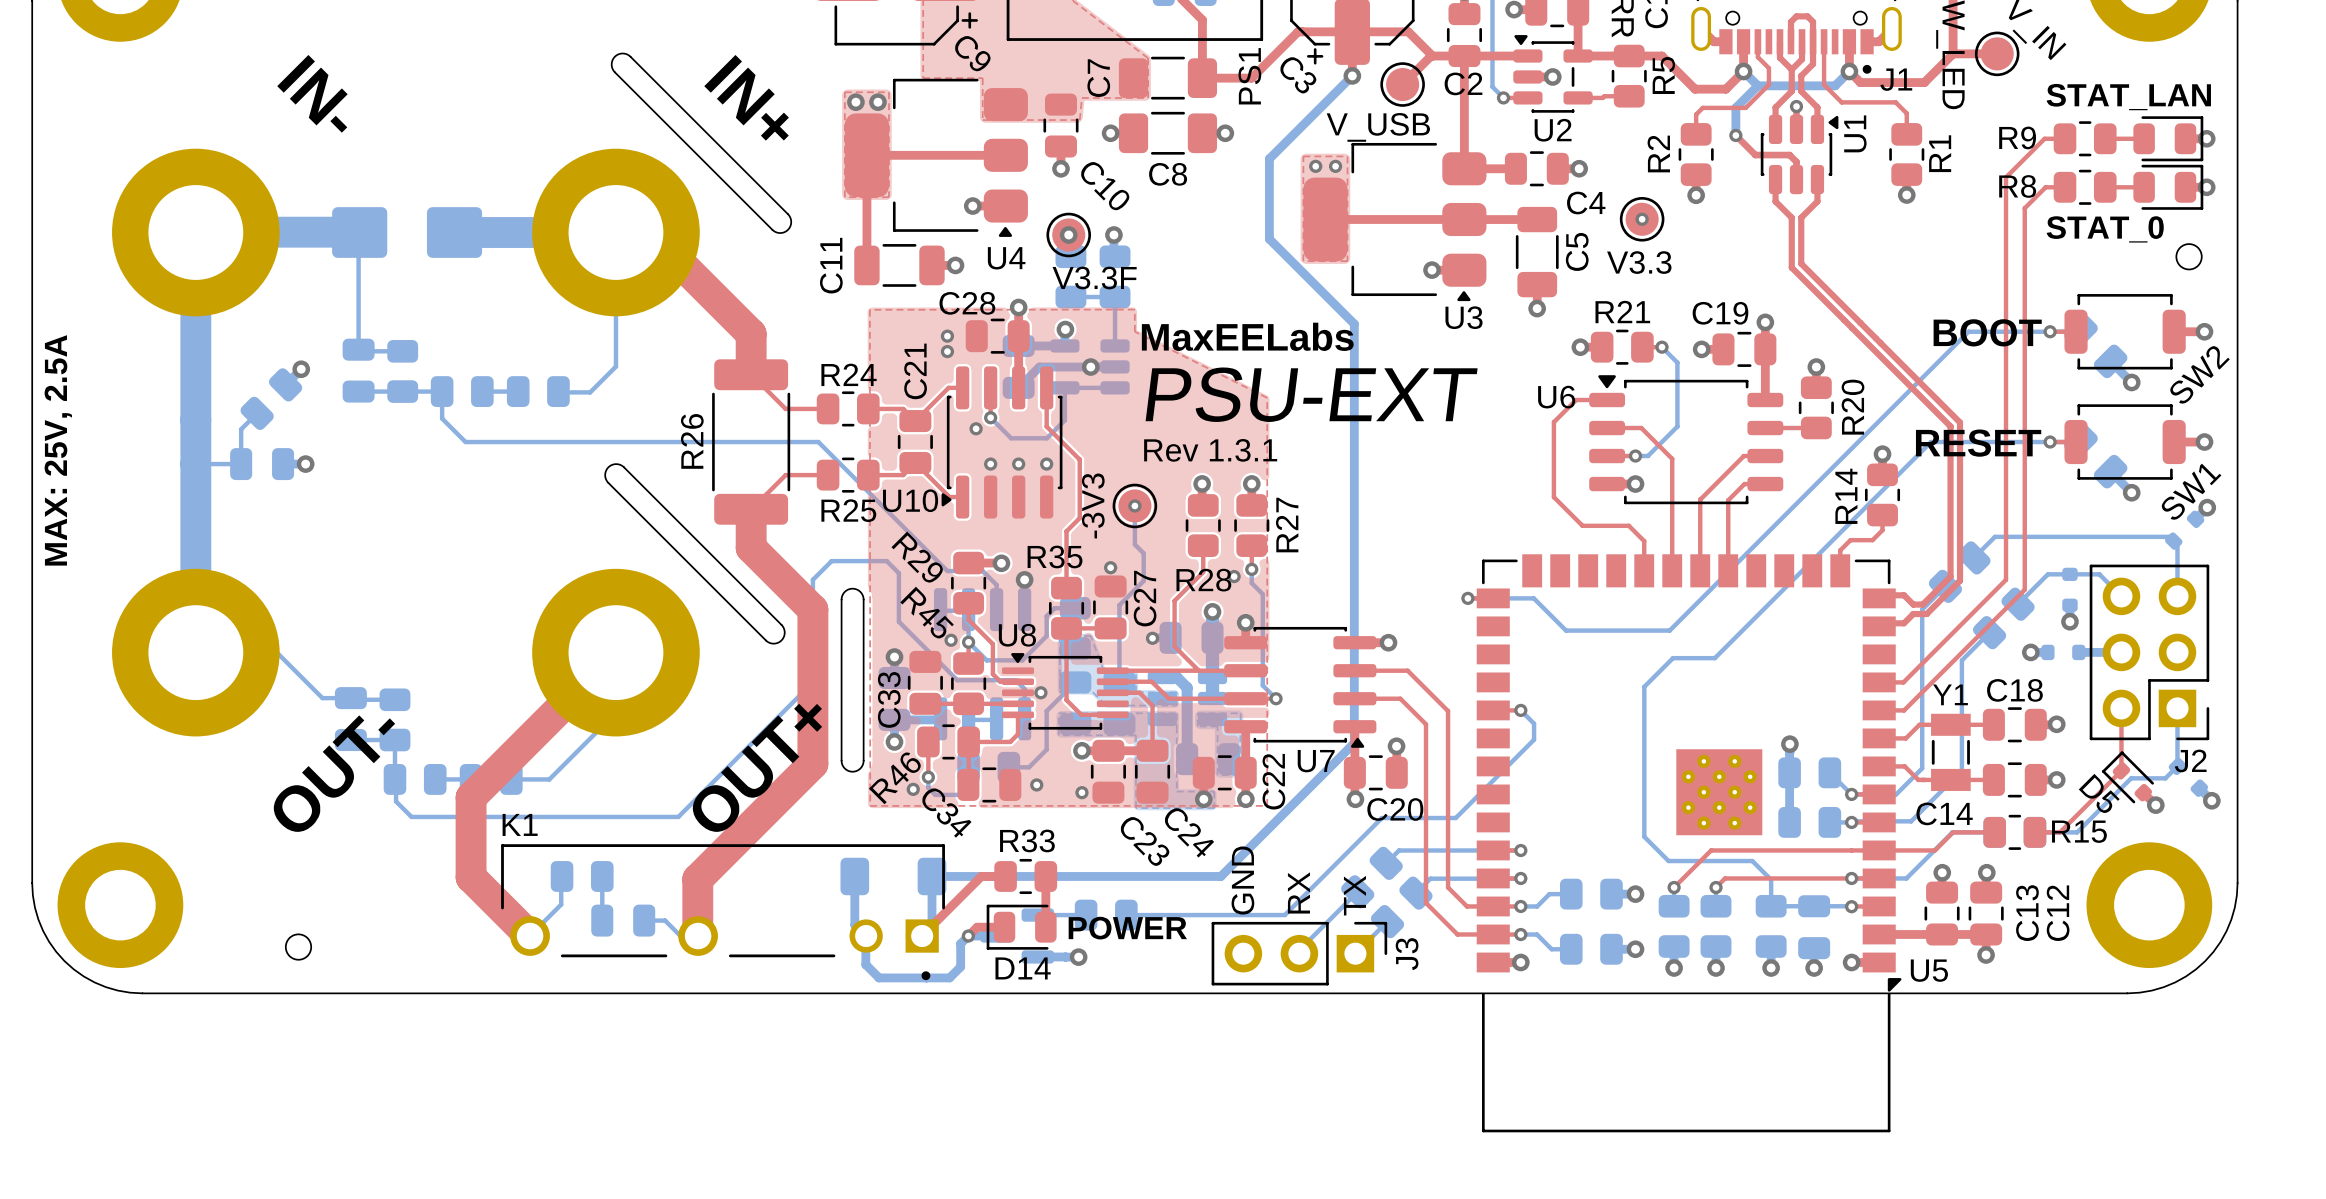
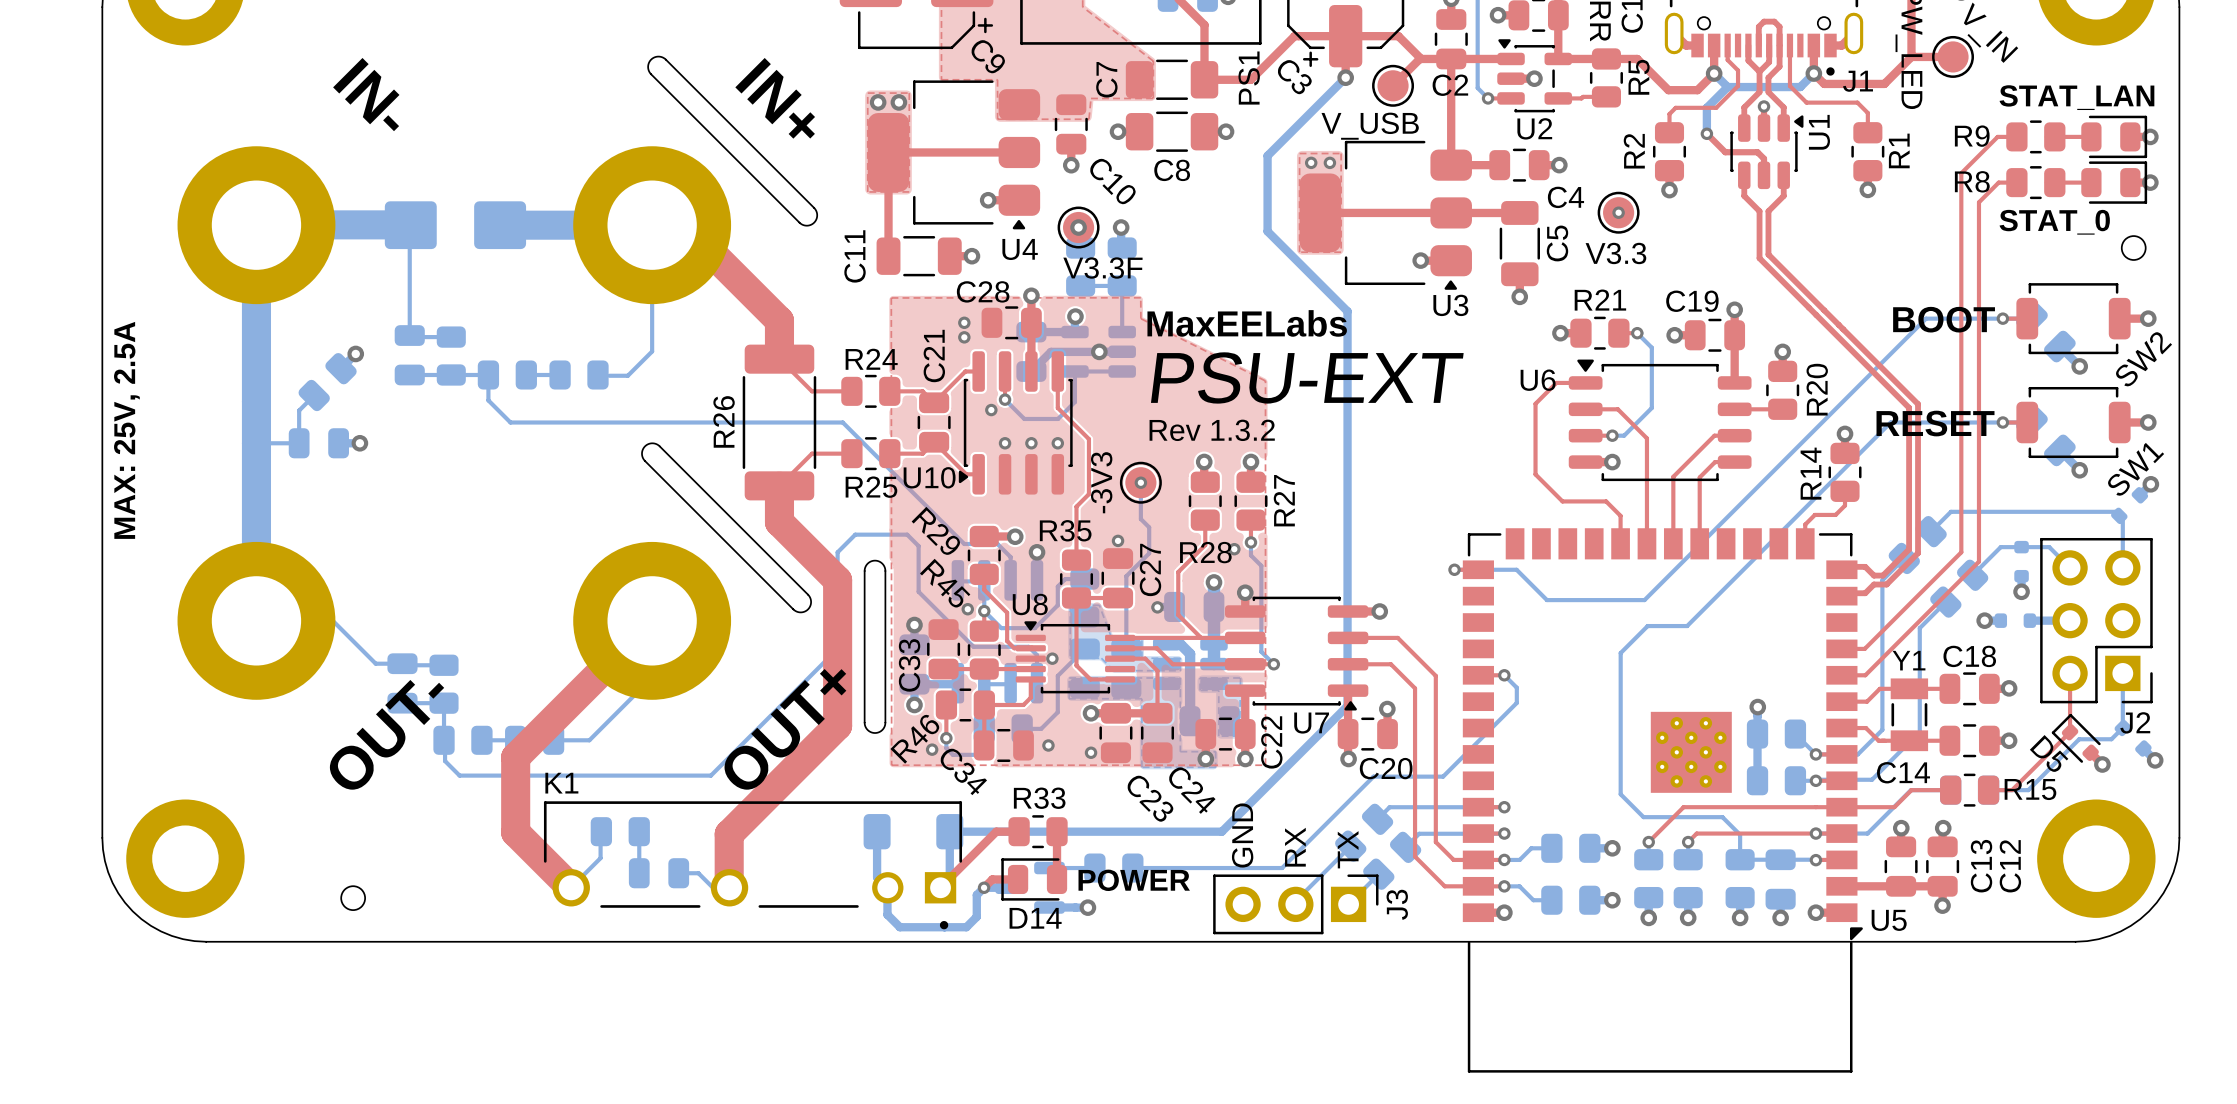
text: Rev 1.3.1 (1210, 450) -> Rev 1.3.2 (1212, 430)

